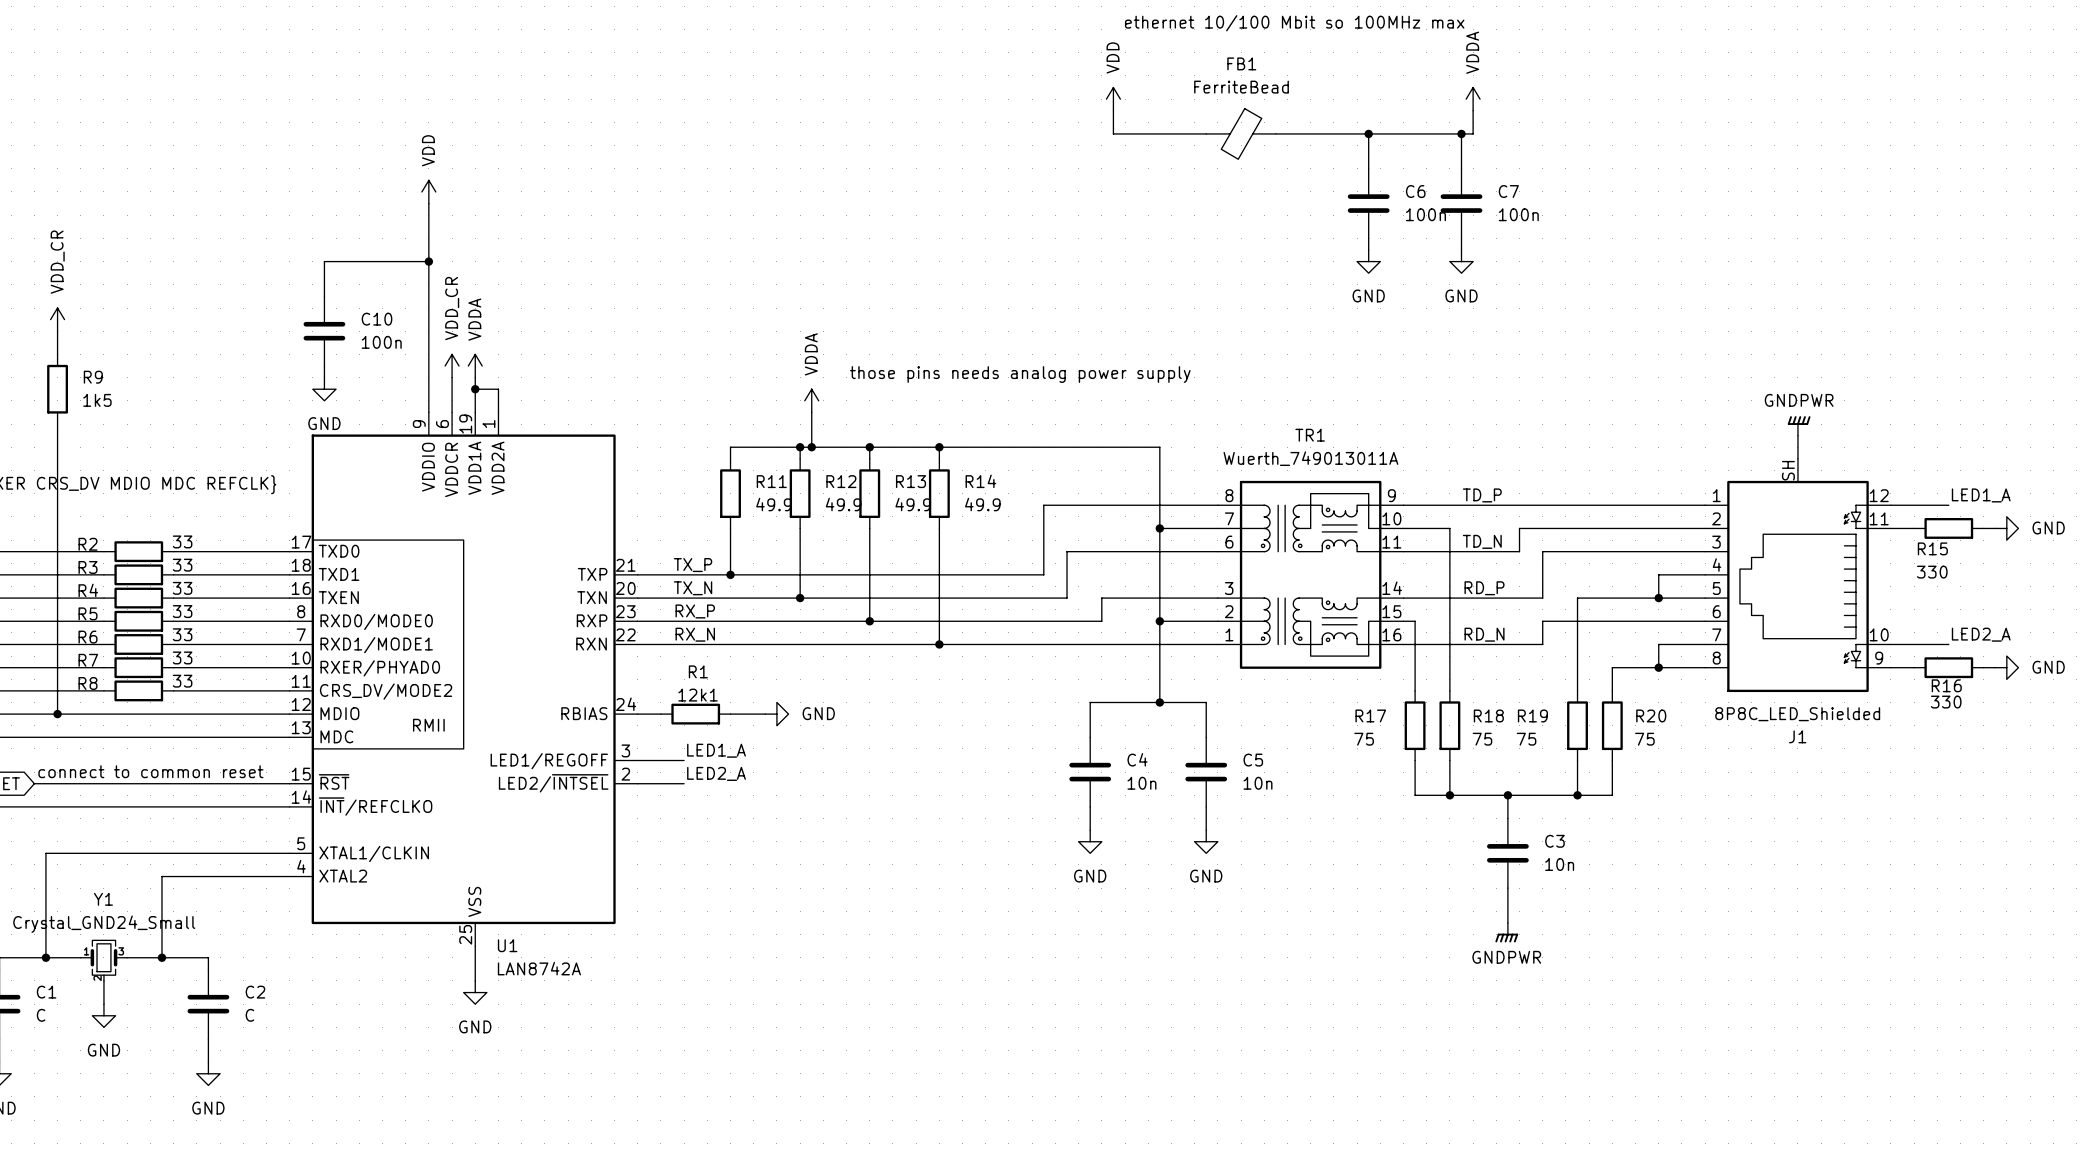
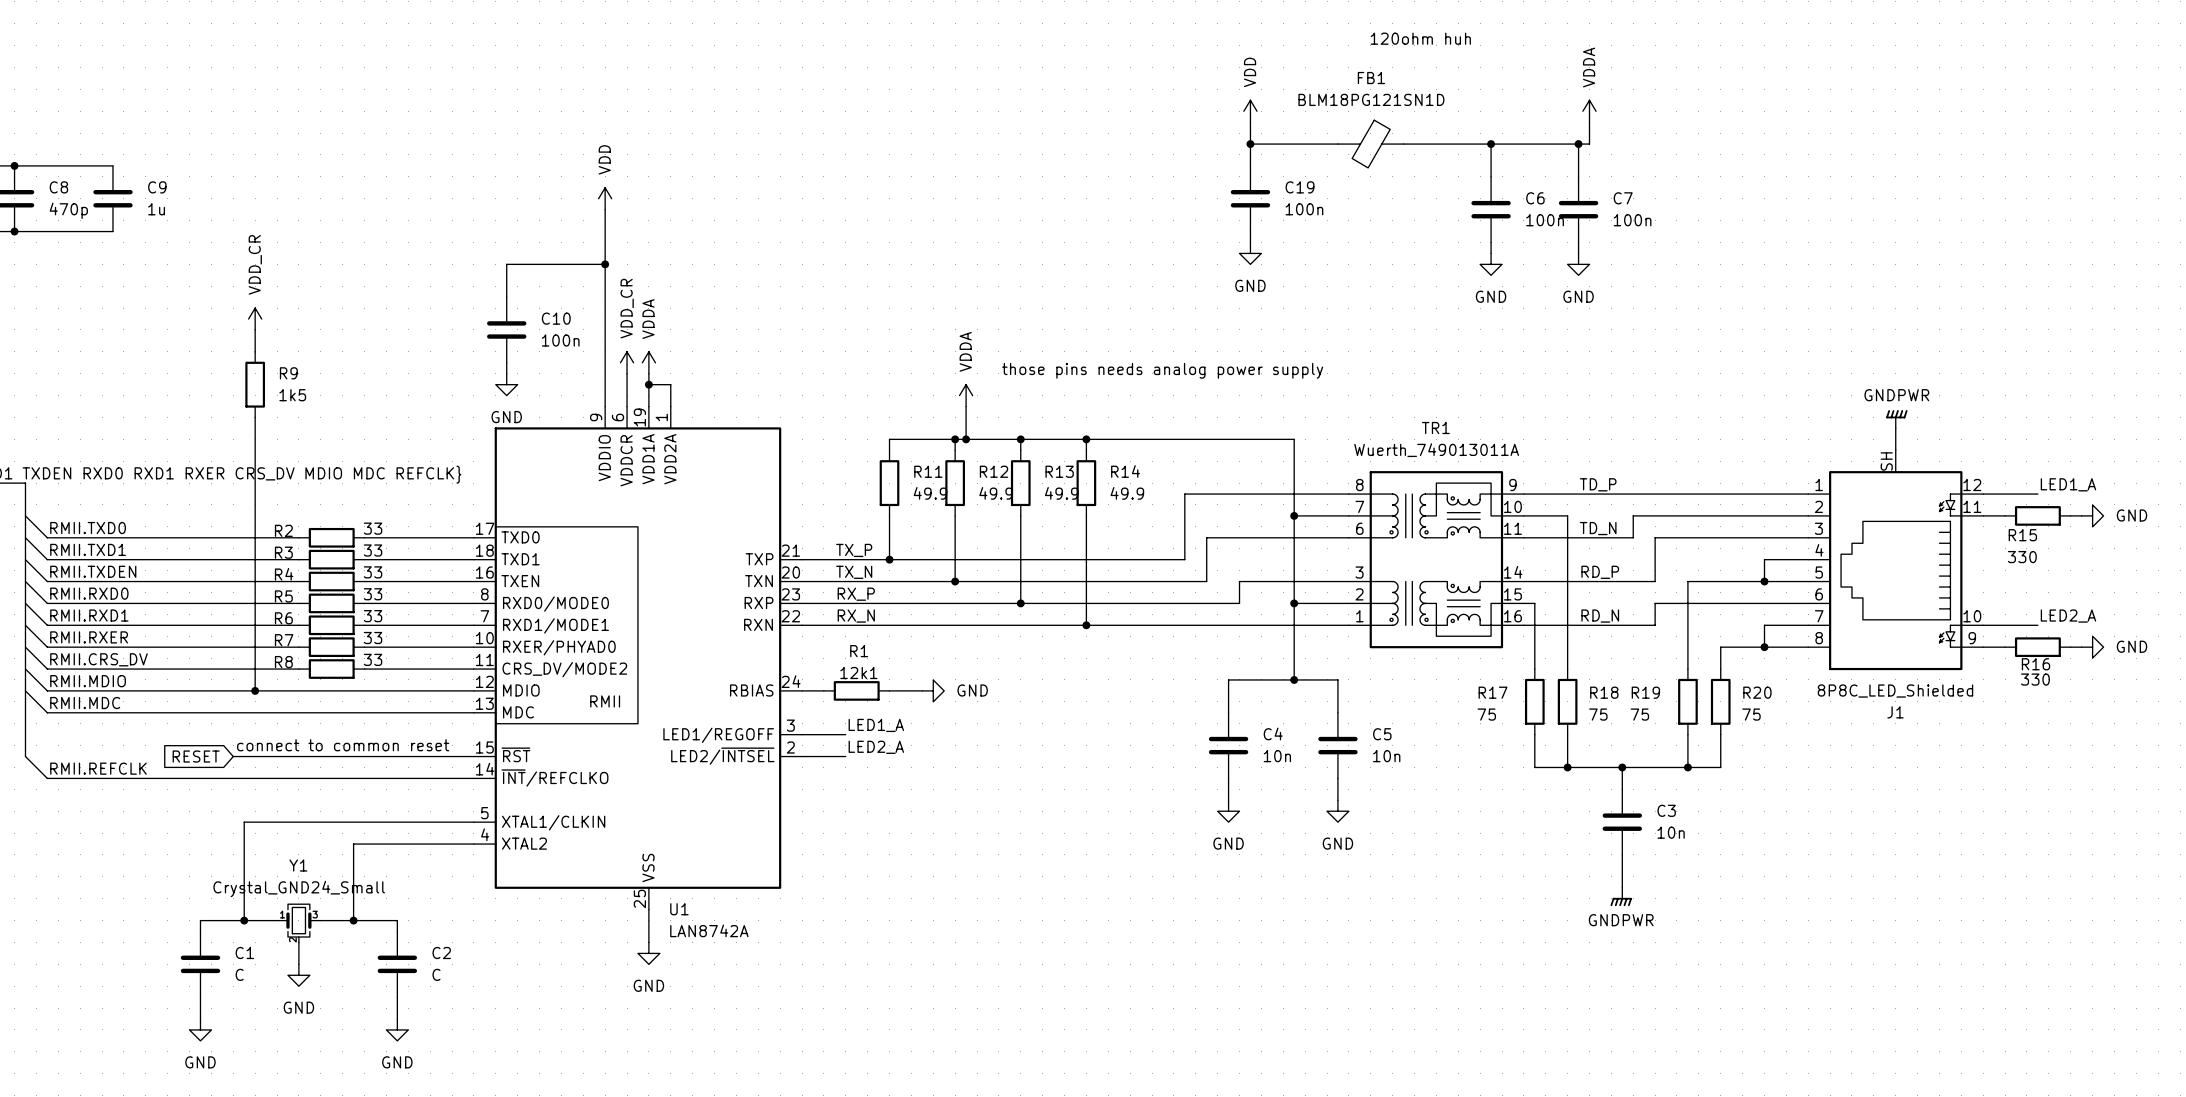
text: ethernet 10/100 Mbit so 100MHz max (1294, 23) -> 120ohm huh (1420, 38)
FB1 value: FerriteBead (1241, 87) -> BLM18PG121SN1D (1371, 99)
wire: none -> (1250, 144) (1250, 165)
junction: none -> (1250, 144)
C19: none -> 100n (1250, 198)
wire: none -> (1250, 231) (1250, 242)
power symbol: none -> GND (1250, 253)

